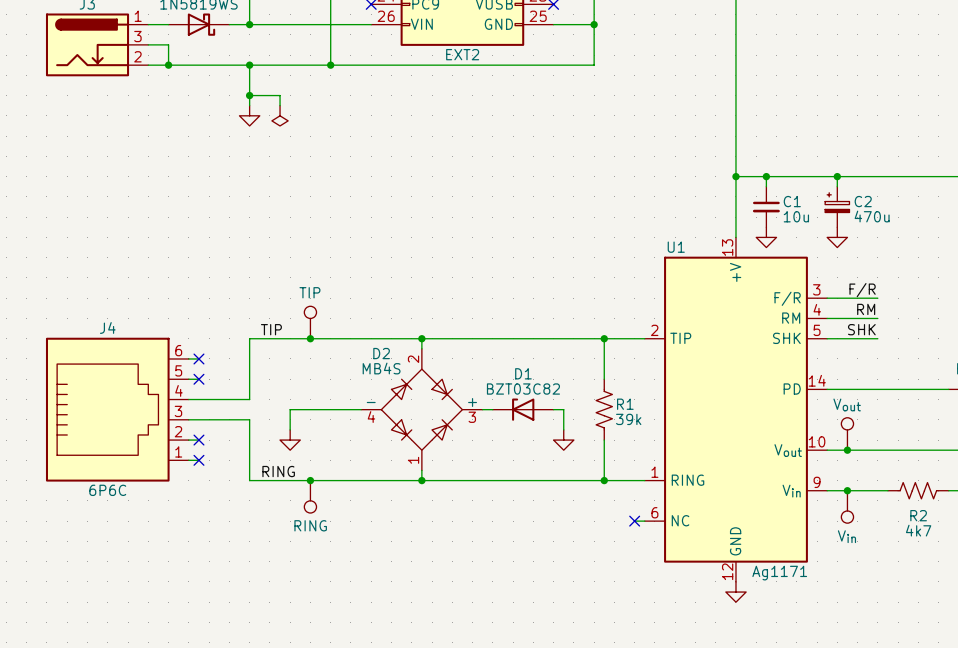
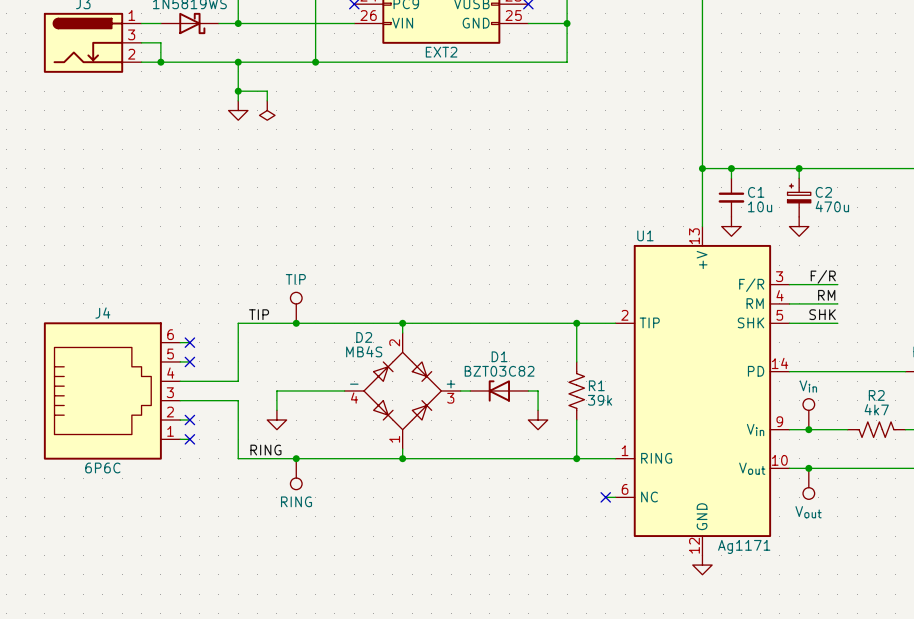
part value: Vout (847, 404) -> Vin (808, 386)
U1 pin number: 10 (817, 441) -> 9 (779, 421)
U1 pin name: Vout (788, 450) -> Vin (755, 430)
U1 pin number: 9 (817, 482) -> 10 (779, 460)
R2 flip: as is (918, 490) -> left-right (876, 429)
R2 position: (918, 490) -> (876, 429)
U1 pin name: Vin (791, 491) -> Vout (752, 468)
R2 name position: R2 (918, 515) -> R2 (876, 395)
R2 value position: 4k7 (918, 530) -> 4k7 (876, 409)
part value: Vin (846, 536) -> Vout (808, 512)

